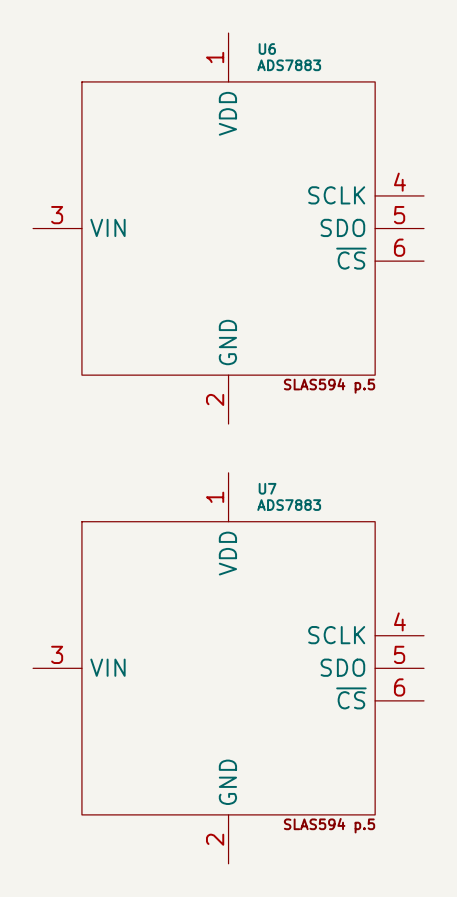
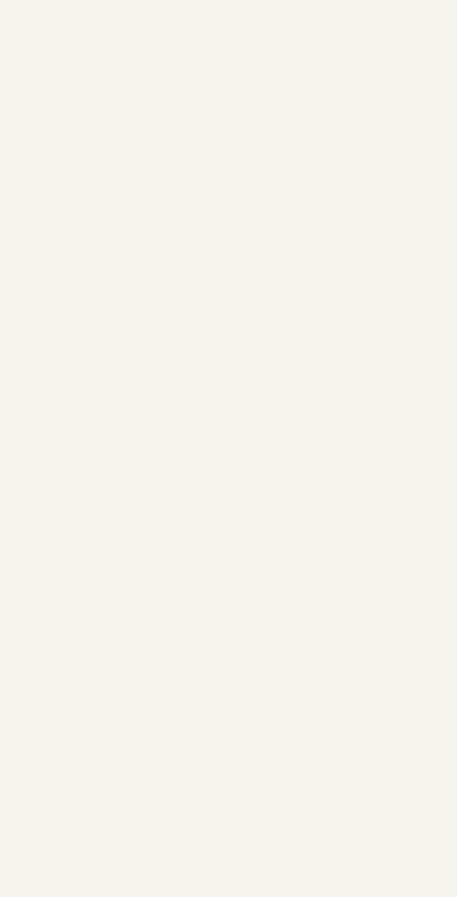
U6: ADS7883 (228, 228) -> none
U7: ADS7883 (228, 668) -> none

